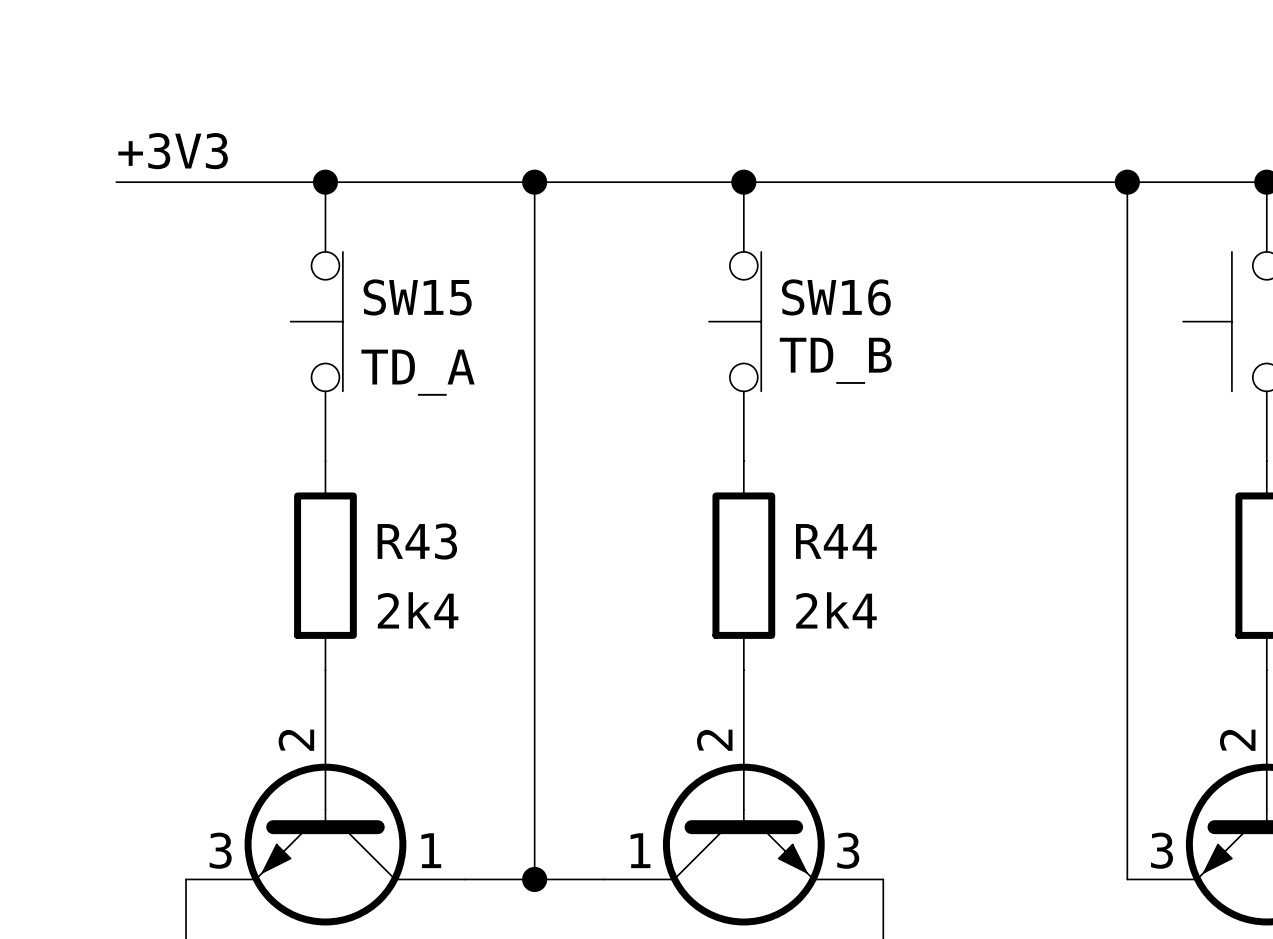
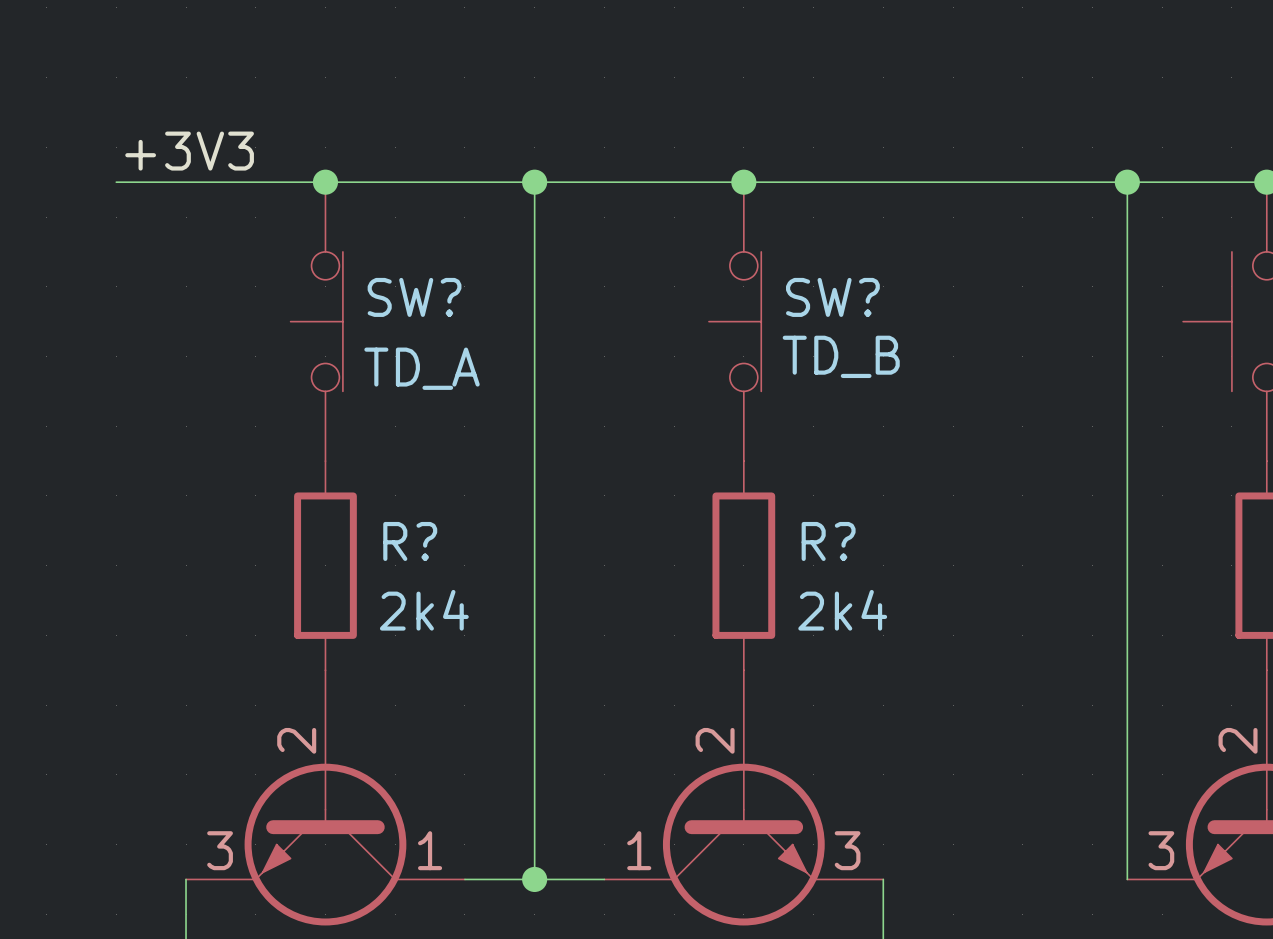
SW15 name: SW15 (417, 297) -> SW? (414, 297)
SW16 name: SW16 (836, 297) -> SW? (832, 297)
R43 name: R43 (417, 541) -> R? (410, 541)
R44 name: R44 (836, 541) -> R? (828, 541)

